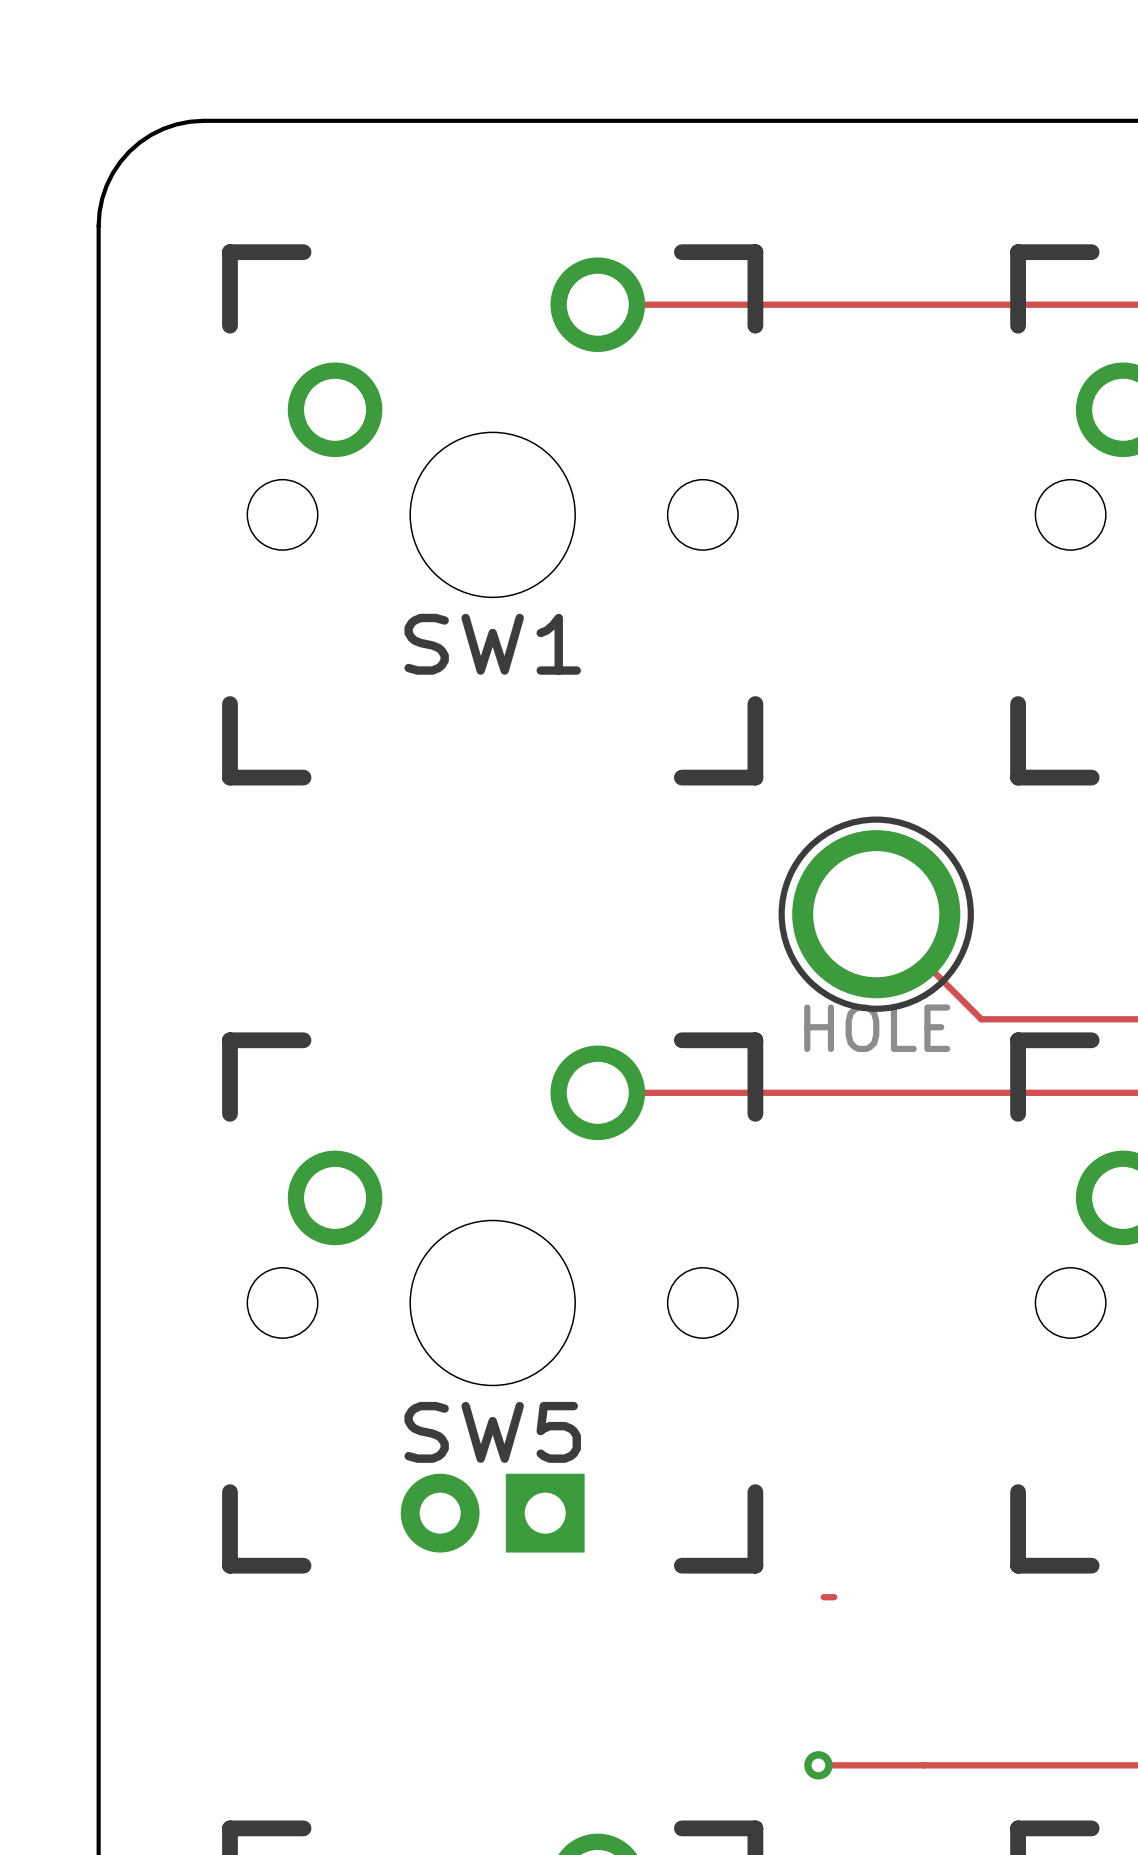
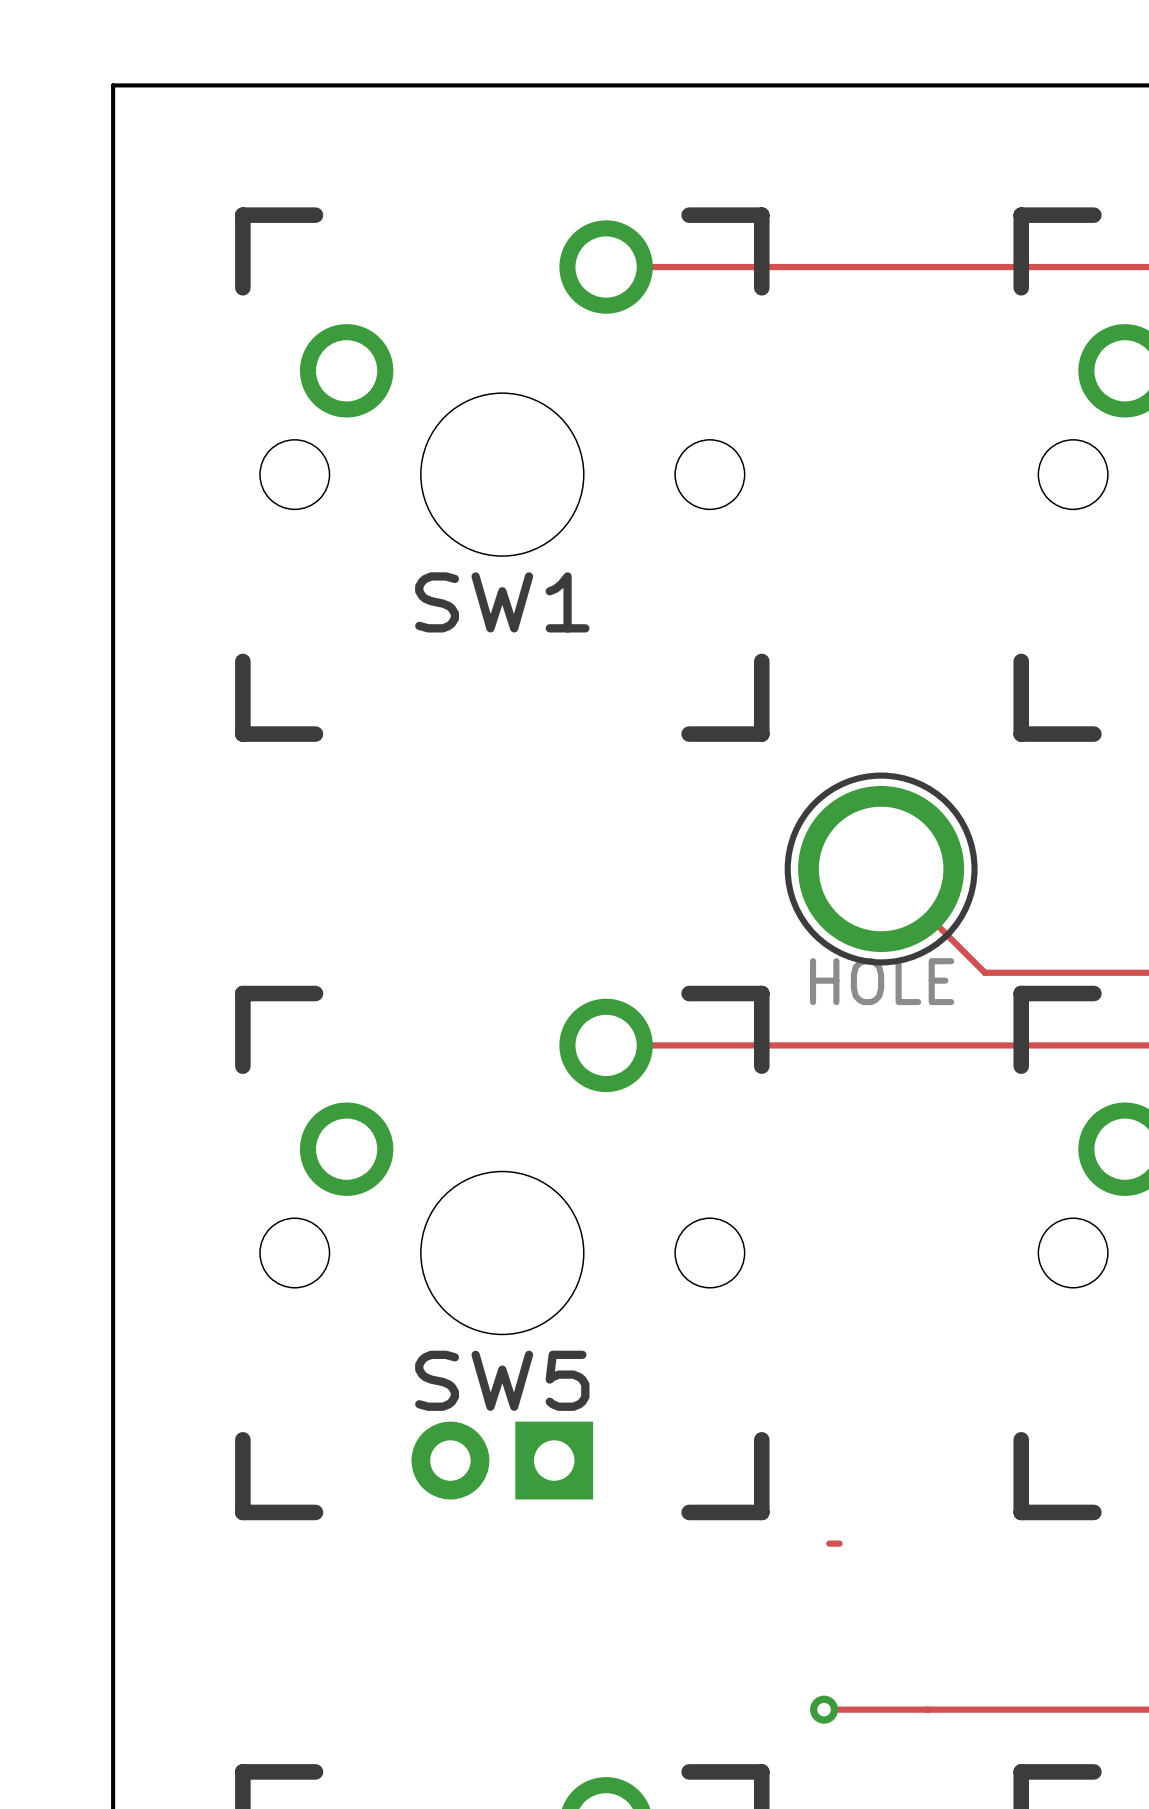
board edge: (203, 120) (176, 124) (163, 128) (151, 134) (129, 151) (120, 161) (106, 185) (102, 198) (98, 225) -> (216, 85) (113, 85) (113, 189)

